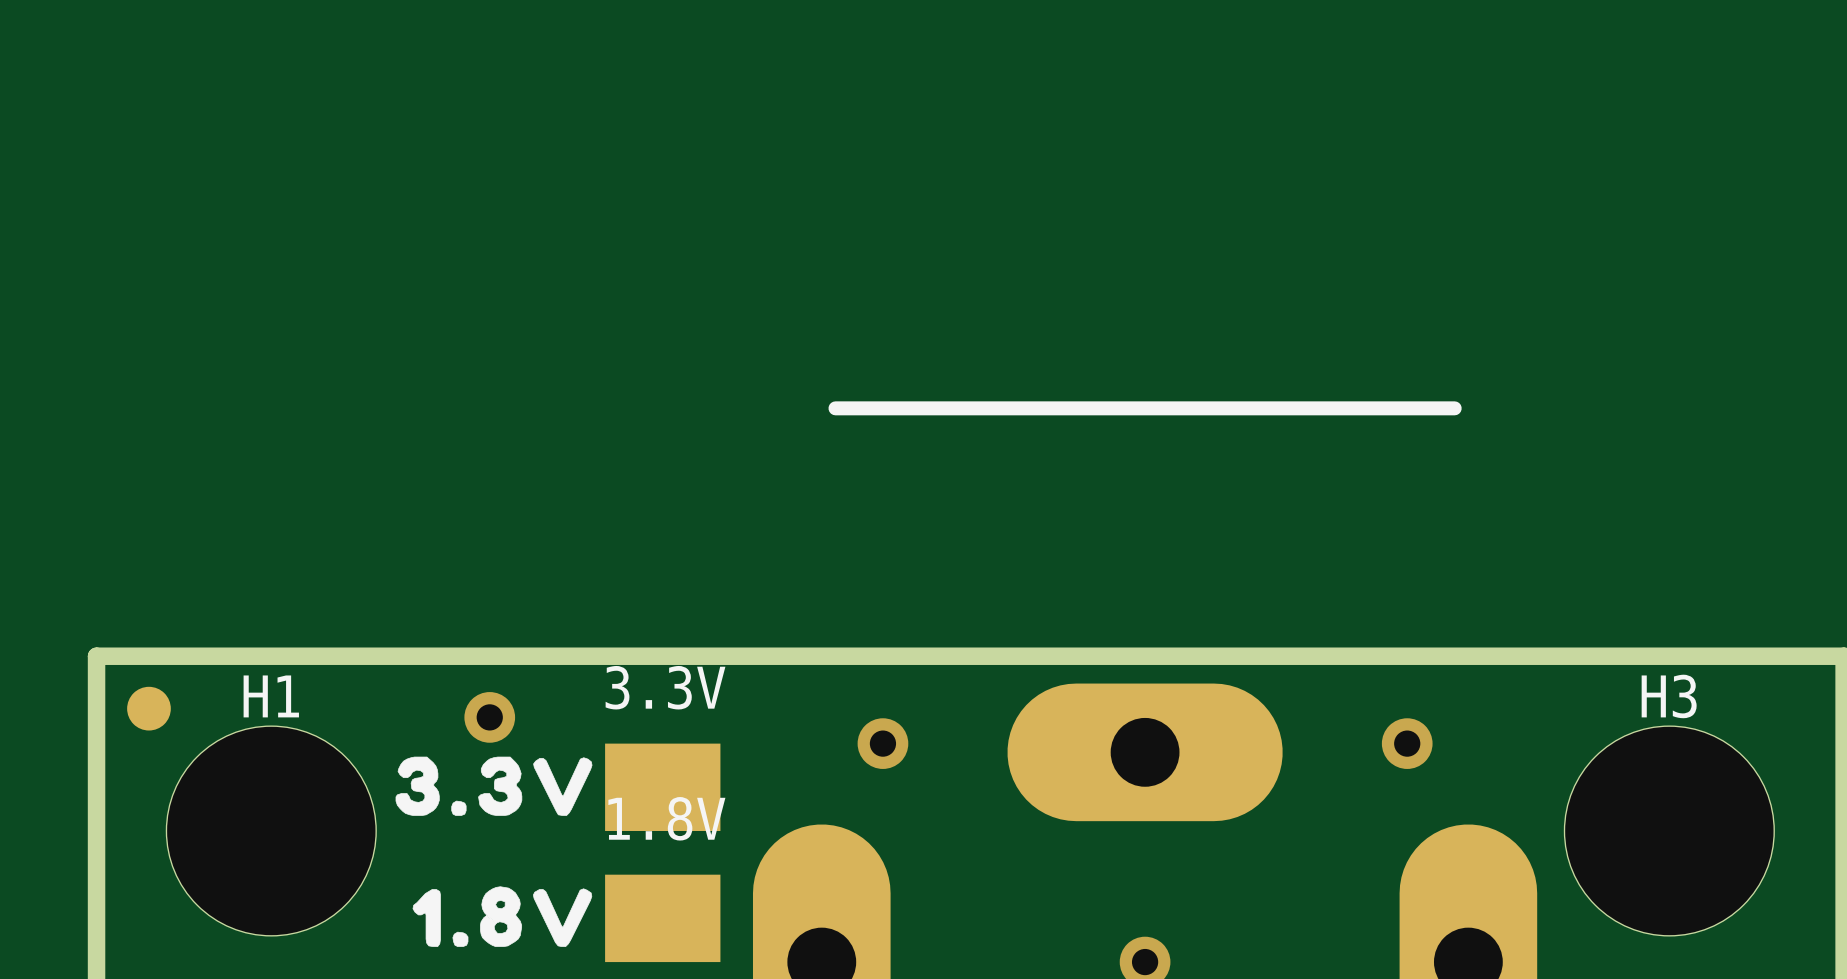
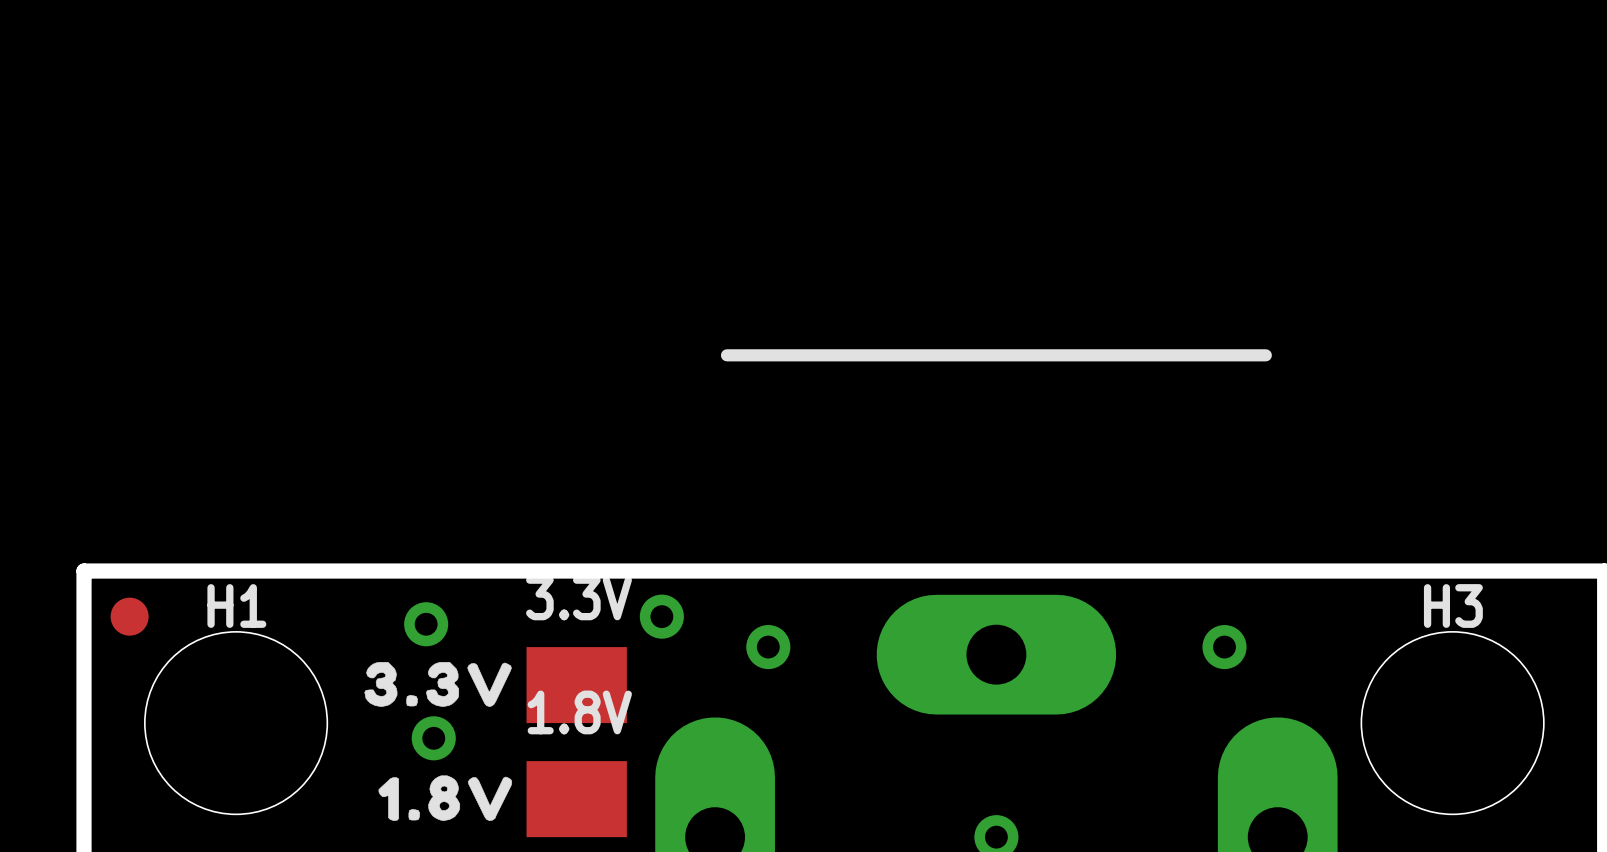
via: none -> (661, 616)
drawing shape: [395, 756, 593, 816] -> [364, 662, 512, 707]
via: none -> (433, 738)
drawing shape: [412, 886, 593, 947] -> [378, 775, 513, 821]

